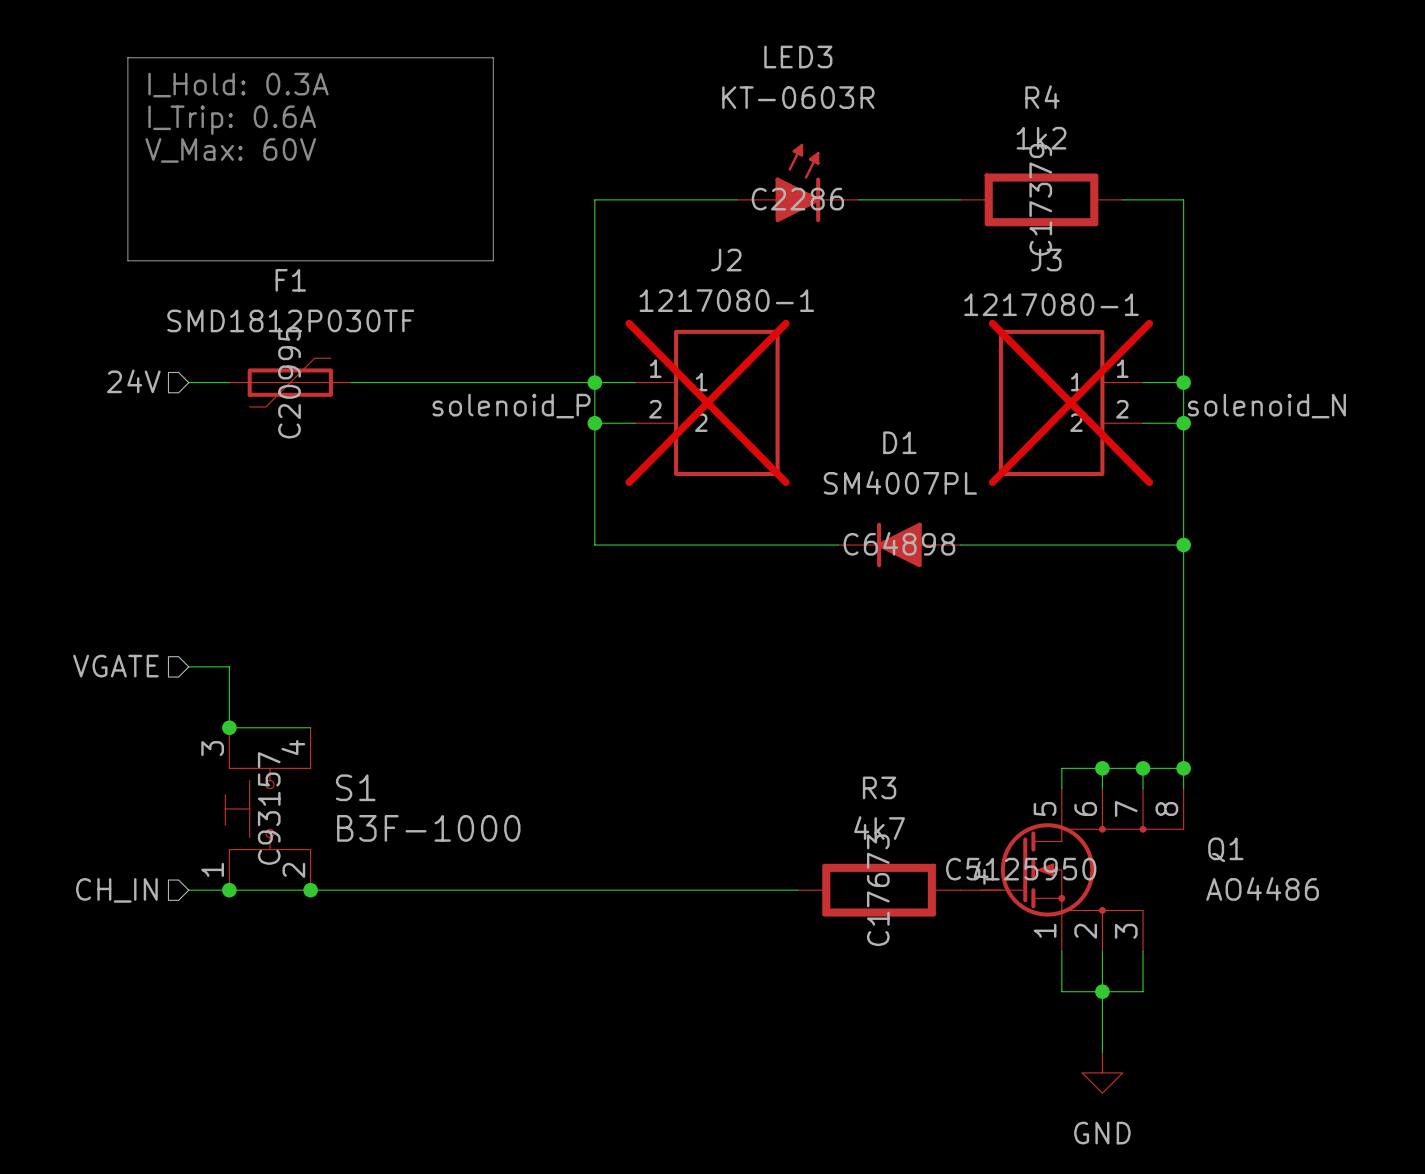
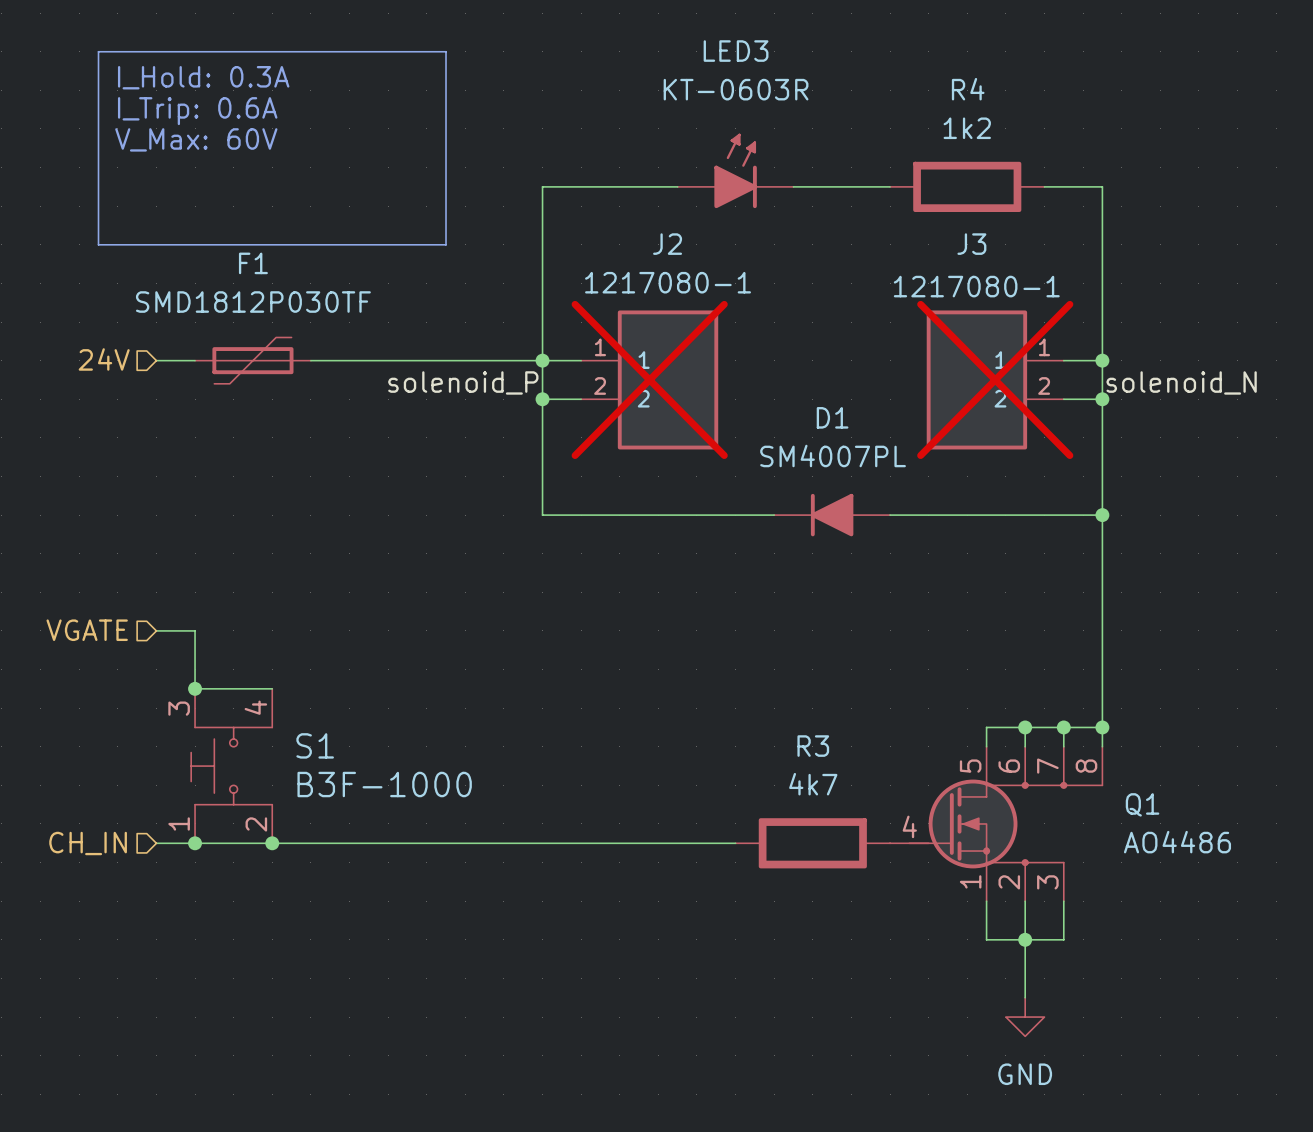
LED3 text: C2286 (797, 199) -> none
R4 text: C17379 (1040, 199) -> none
F1 text: C20995 (289, 382) -> none
D1 text: C64898 (899, 543) -> none
S1 text: C93157 (269, 808) -> none
Q1 text: C5125950 (1021, 869) -> none
R3 text: C17673 (878, 890) -> none

